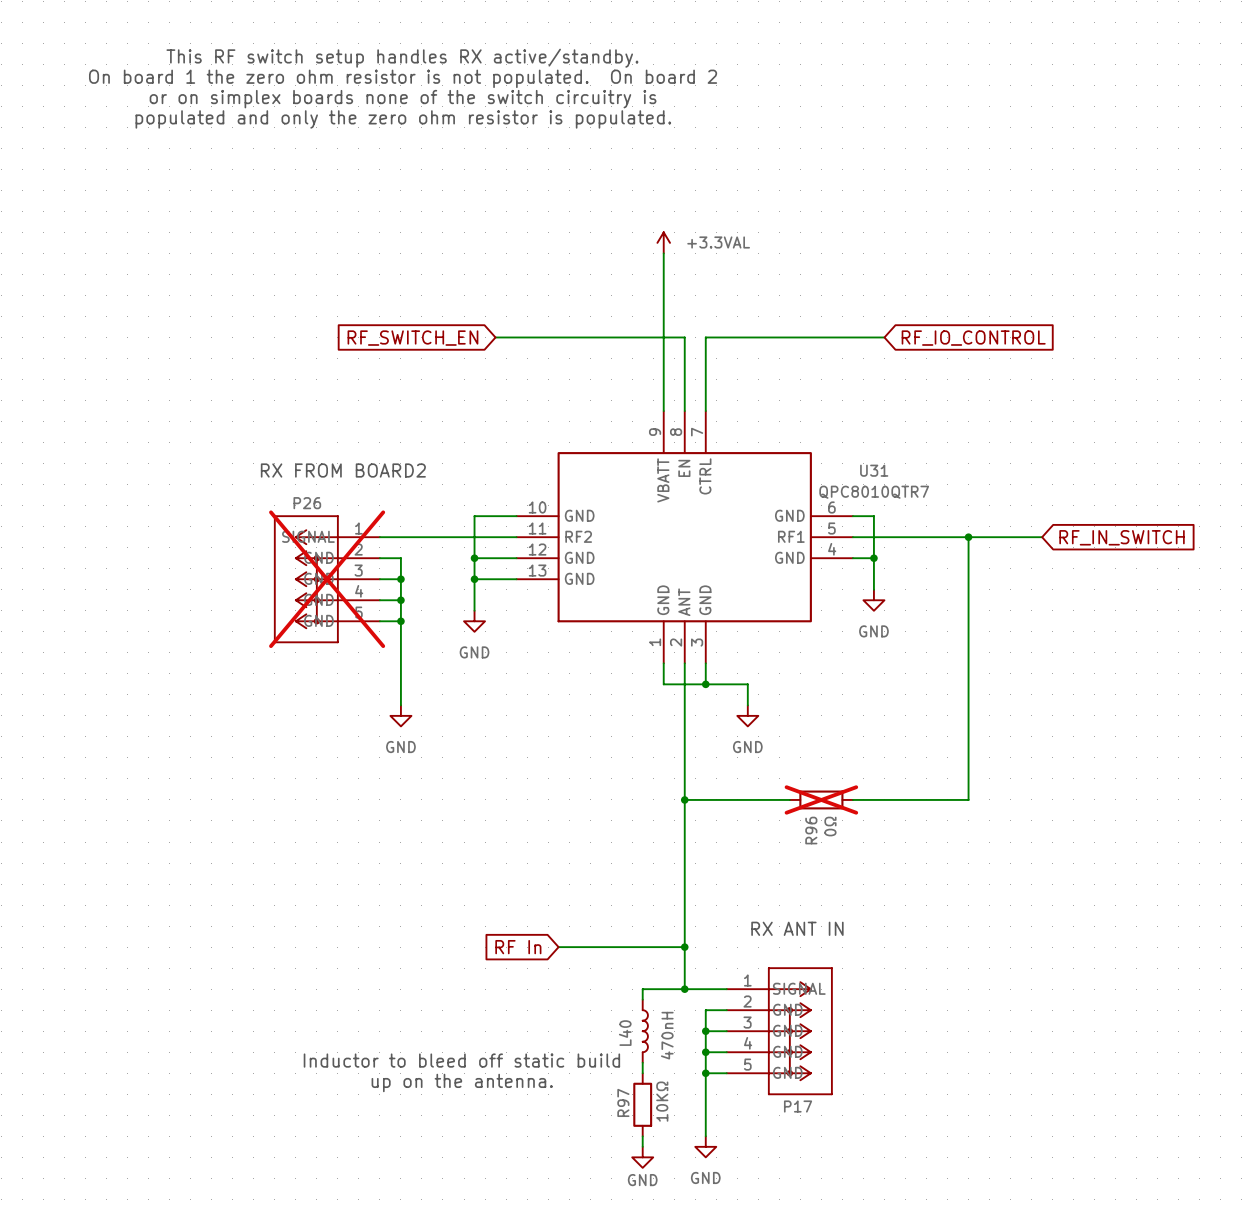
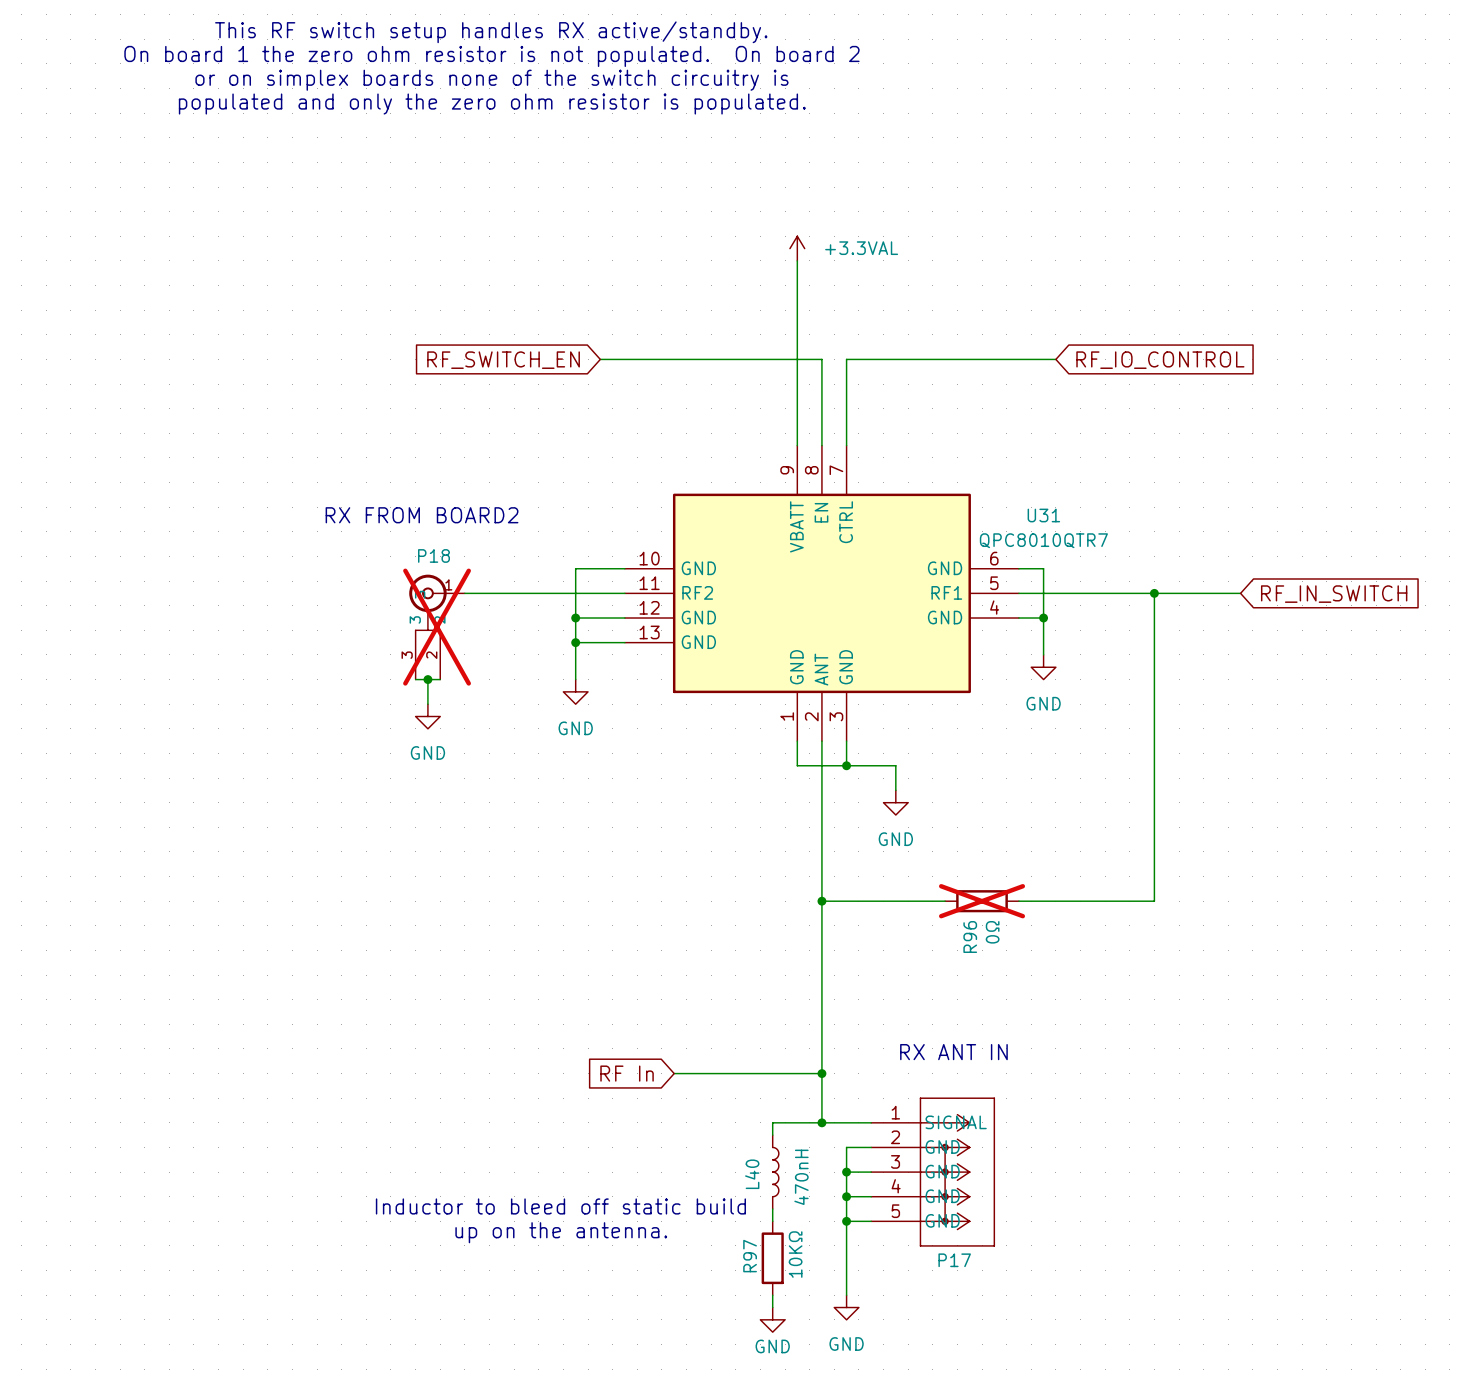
wire: (379, 558) (400, 558) (400, 705) -> none
P18: none -> (437, 627)
P26: (327, 579) -> none
wire: (379, 579) (400, 579) -> none
junction: (400, 579) -> none
wire: (379, 600) (400, 600) -> (415, 679) (440, 679)
junction: (400, 600) -> none
wire: none -> (427, 679) (427, 704)
junction: none -> (427, 679)
wire: (379, 621) (400, 621) -> none
junction: (400, 621) -> none
power symbol position: GND (400, 715) -> GND (427, 716)

